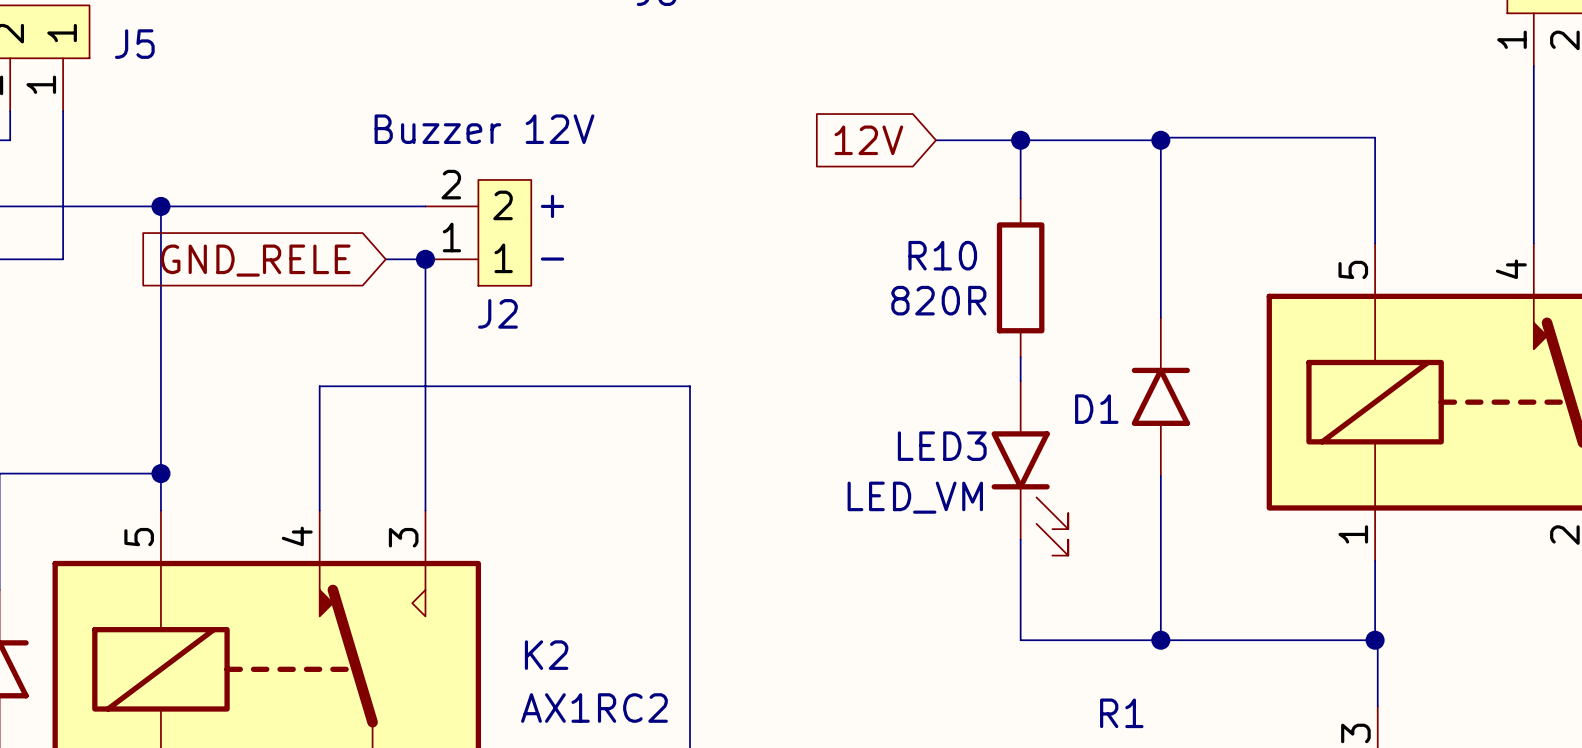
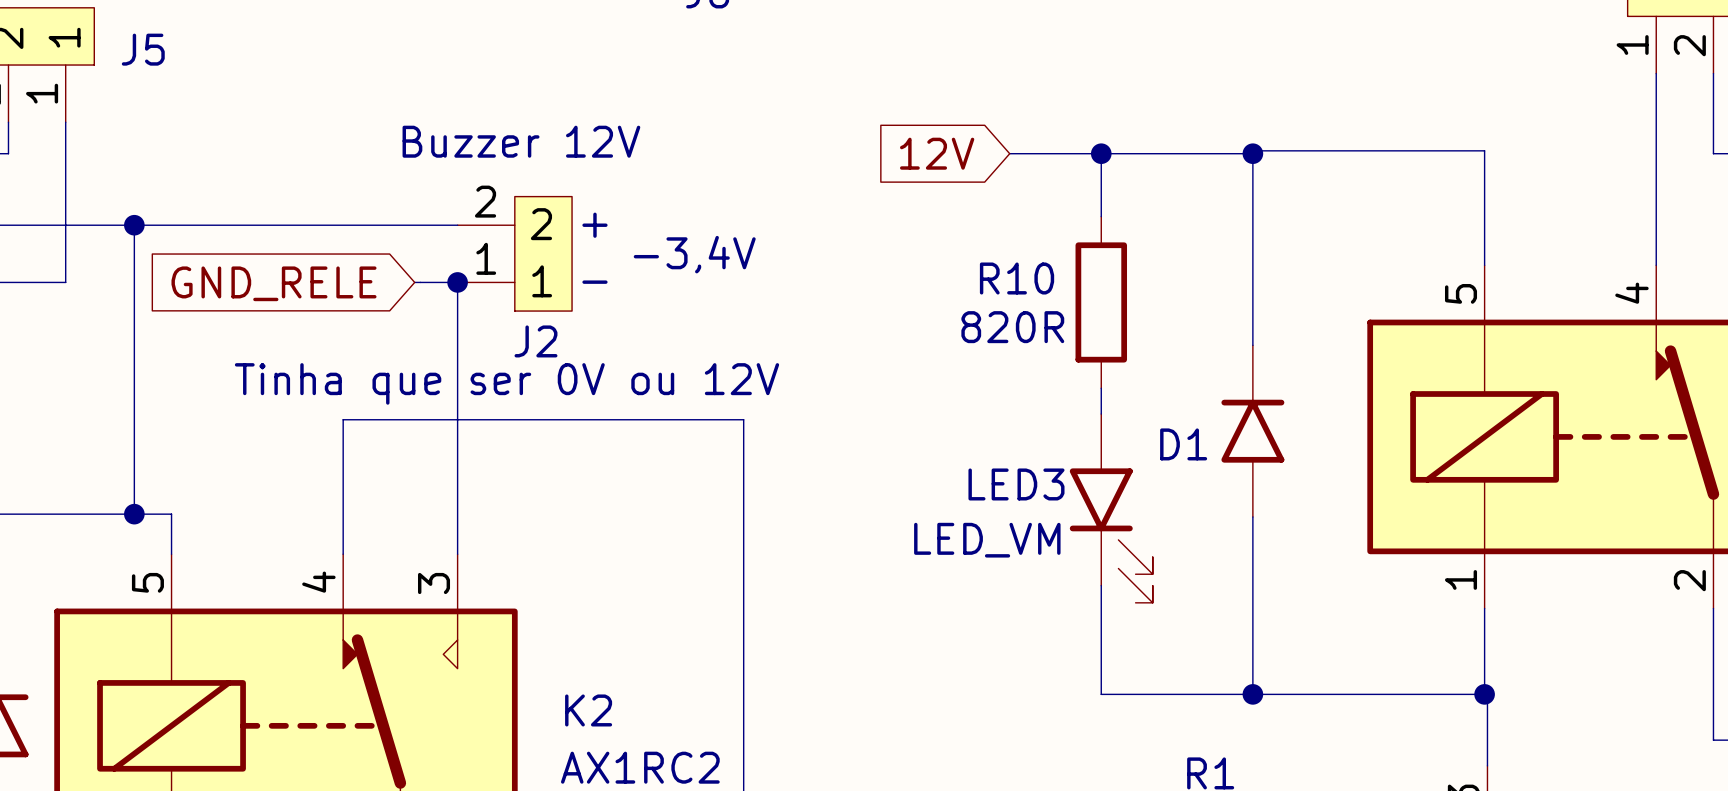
wire: (160, 206) (160, 473) -> (134, 225) (134, 514)
junction position: (160, 206) -> (134, 225)
text: none -> -3,4V (694, 254)
text: none -> Tinha que ser 0V ou 12V (507, 383)
junction position: (160, 473) -> (134, 514)

